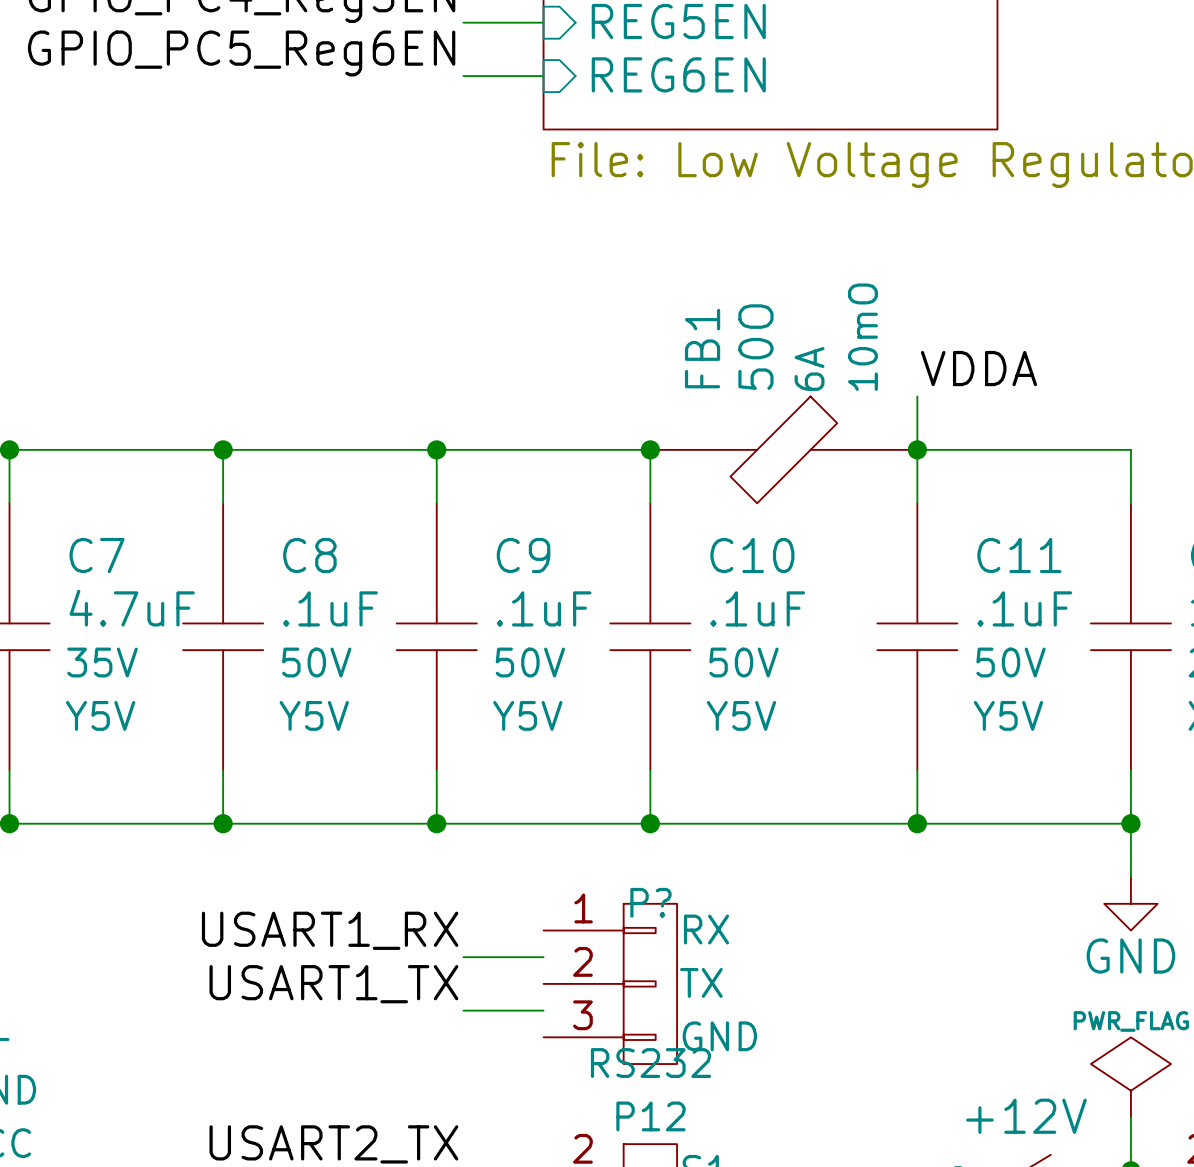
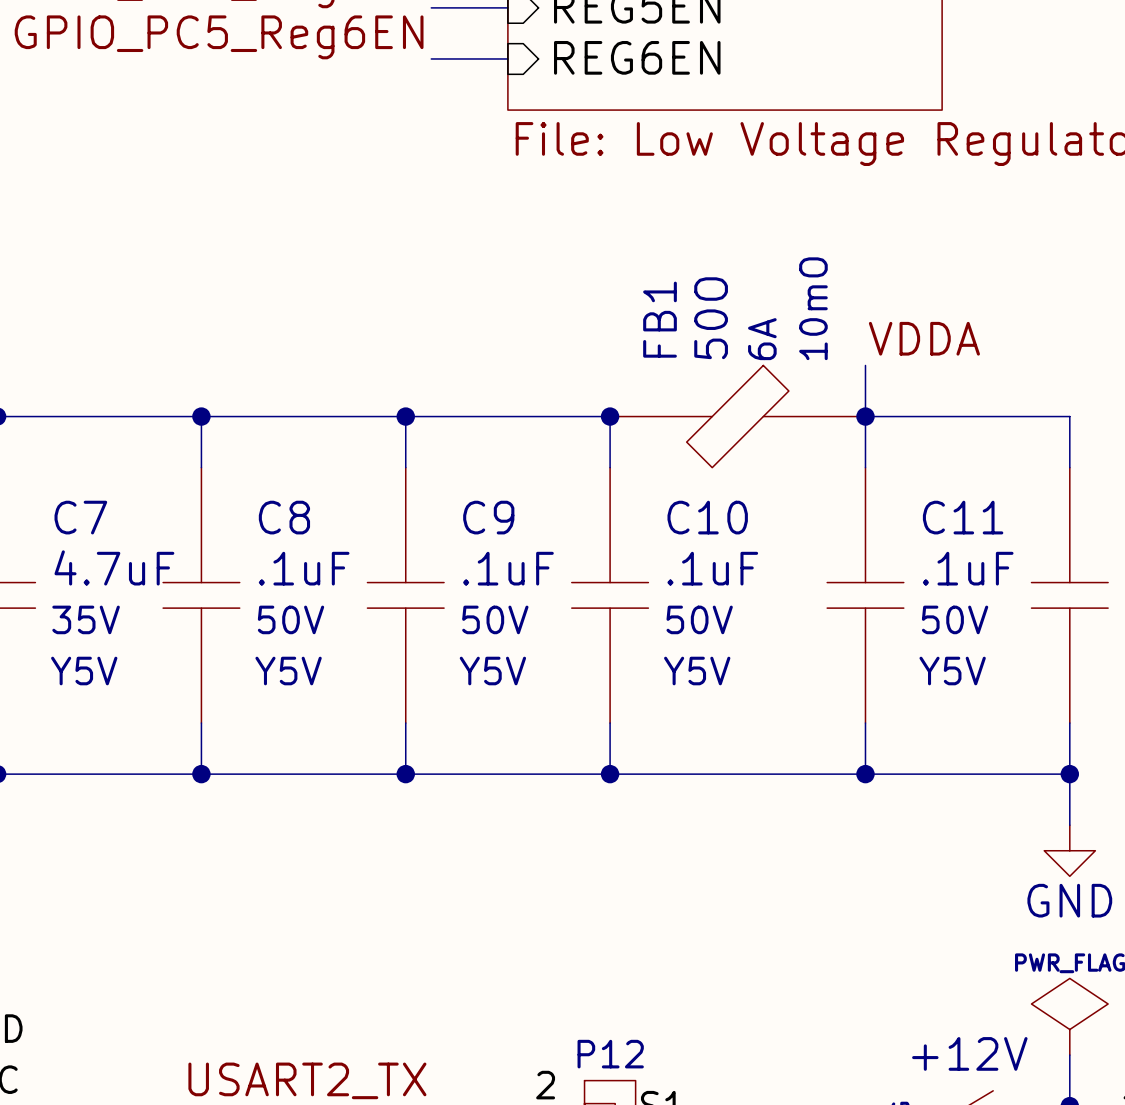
label: USART1_RX (330, 930) -> none
wire: (463, 957) (543, 957) -> none
P?: RS232 (610, 983) -> none
label: USART1_TX (333, 984) -> none
wire: (463, 1010) (543, 1010) -> none

